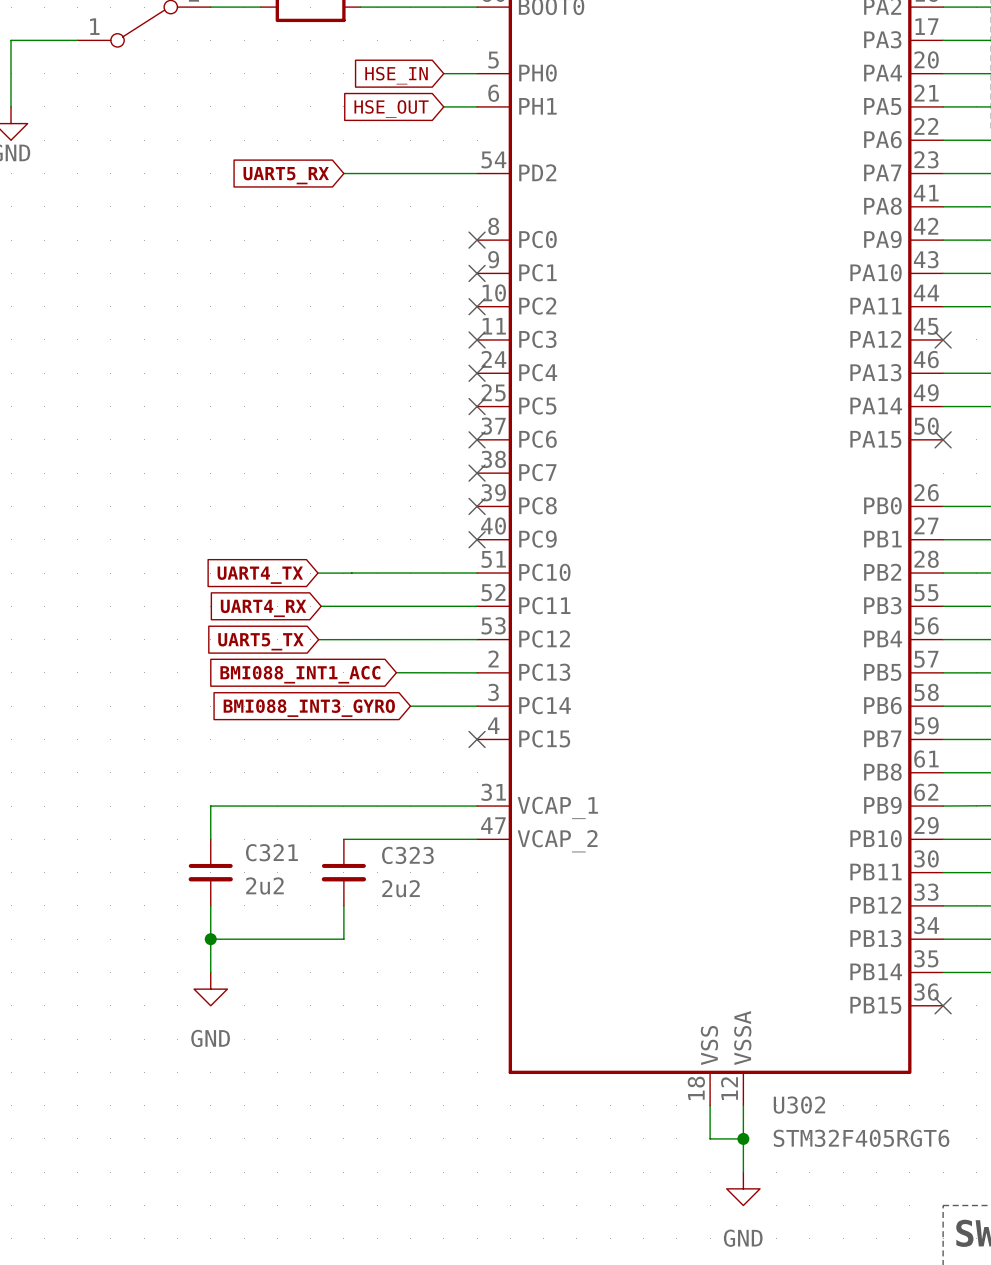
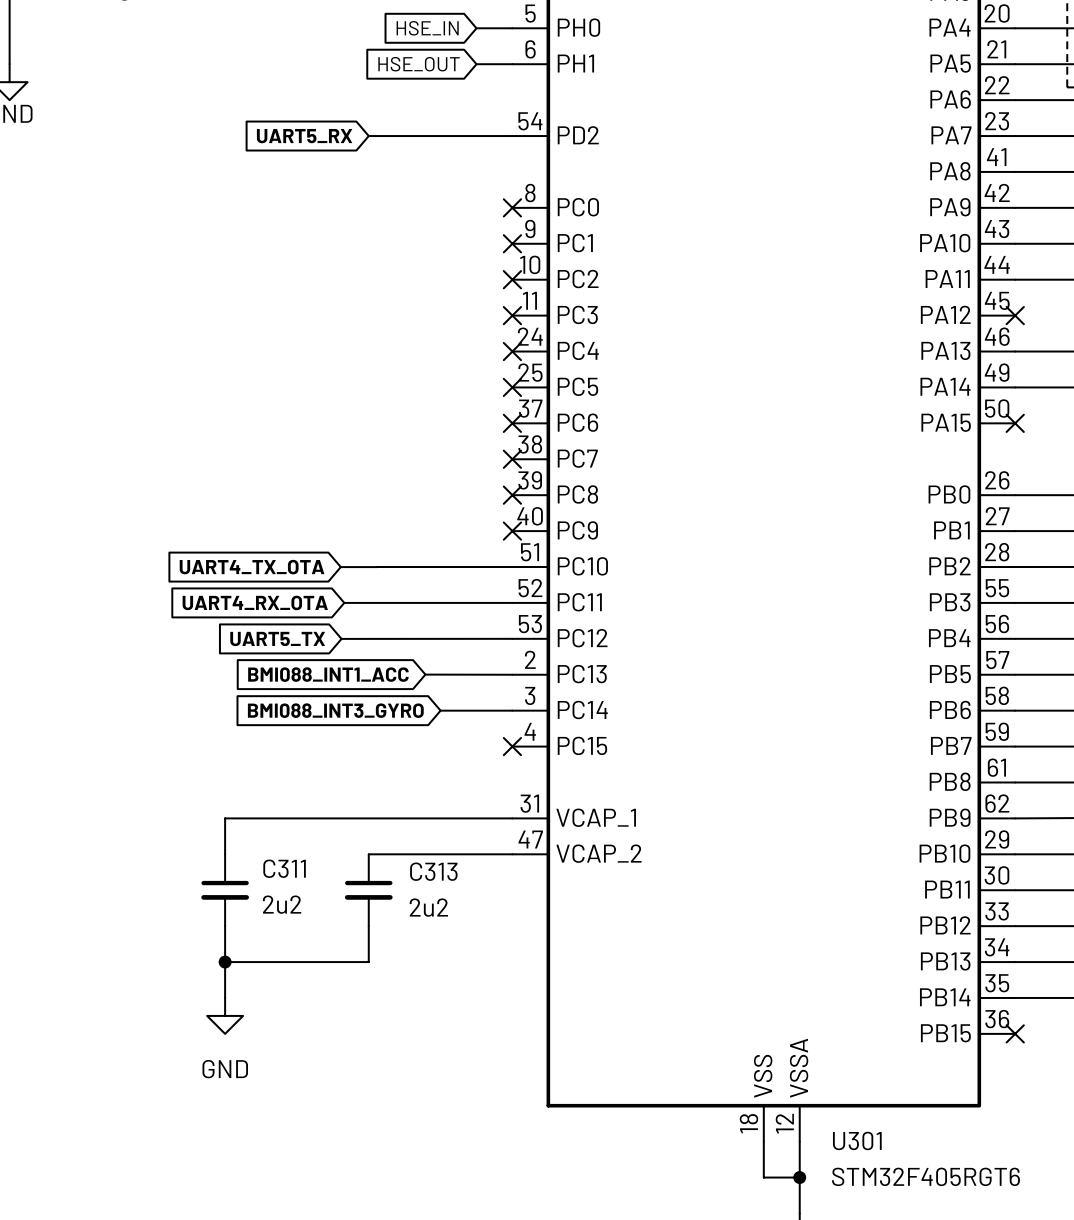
global label: UART4_TX (260, 575) -> UART4_TX_OTA (252, 567)
global label: UART4_RX (263, 608) -> UART4_RX_OTA (255, 602)
C321 name: C321 (271, 852) -> C311 (284, 868)
C323 name: C323 (407, 855) -> C313 (433, 871)
U302 name: U302 (799, 1105) -> U301 (857, 1140)

